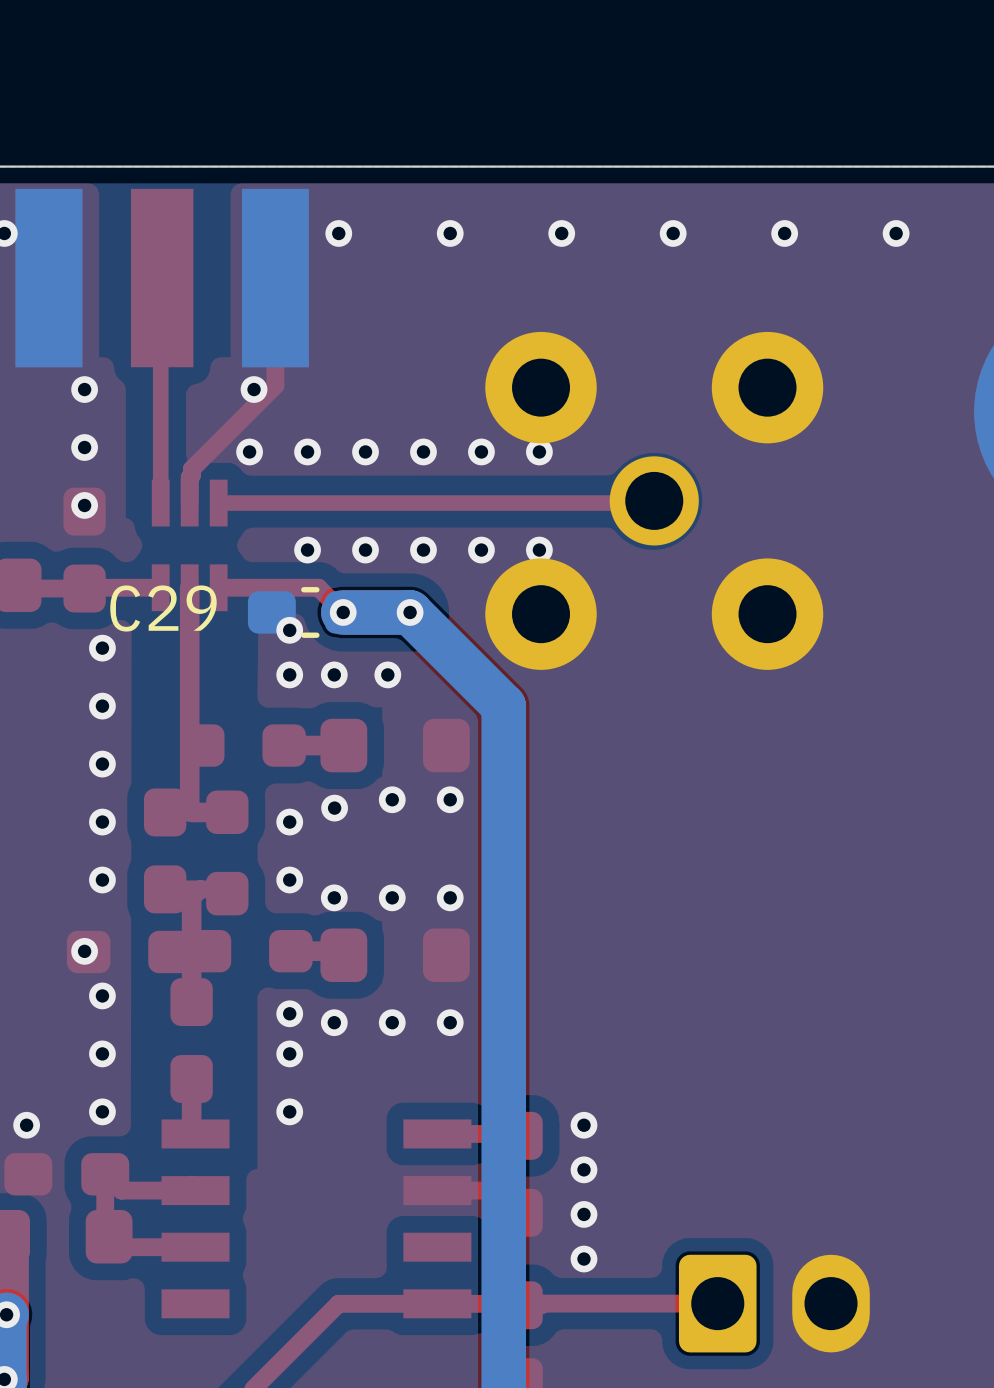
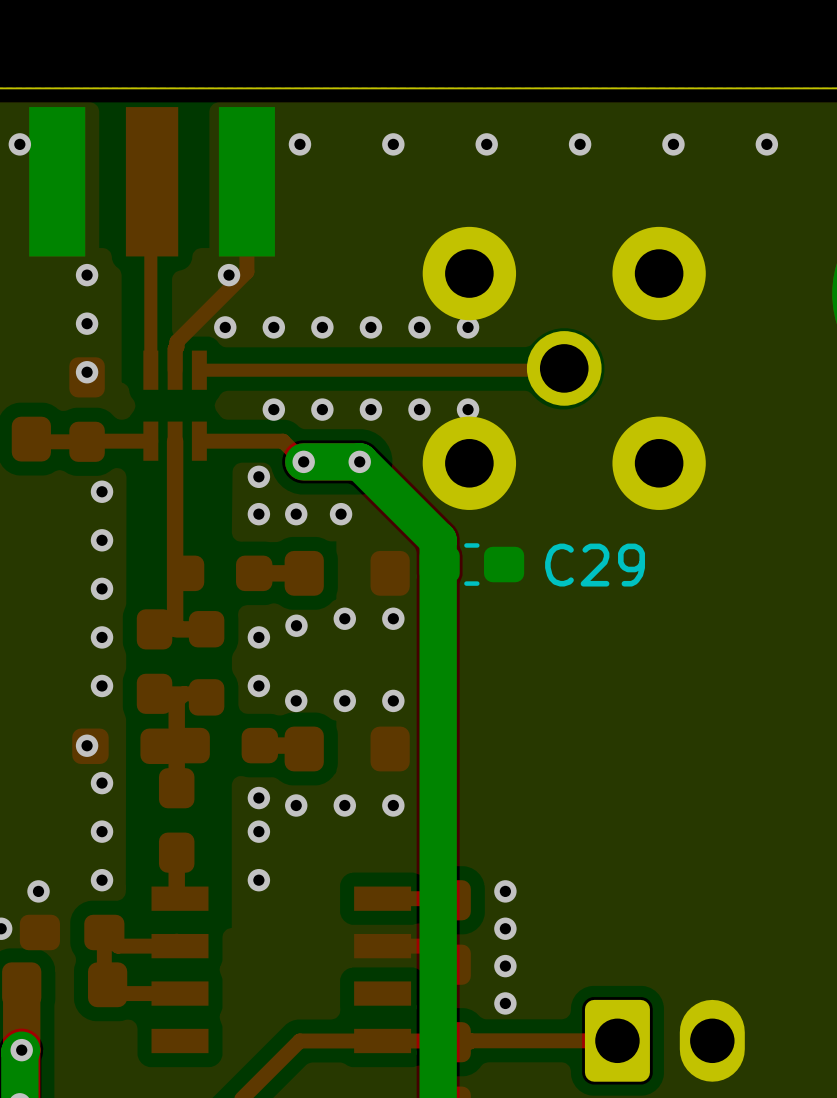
C29 name position: C29 (163, 608) -> C29 (595, 565)
C29 position: (310, 612) -> (471, 564)

